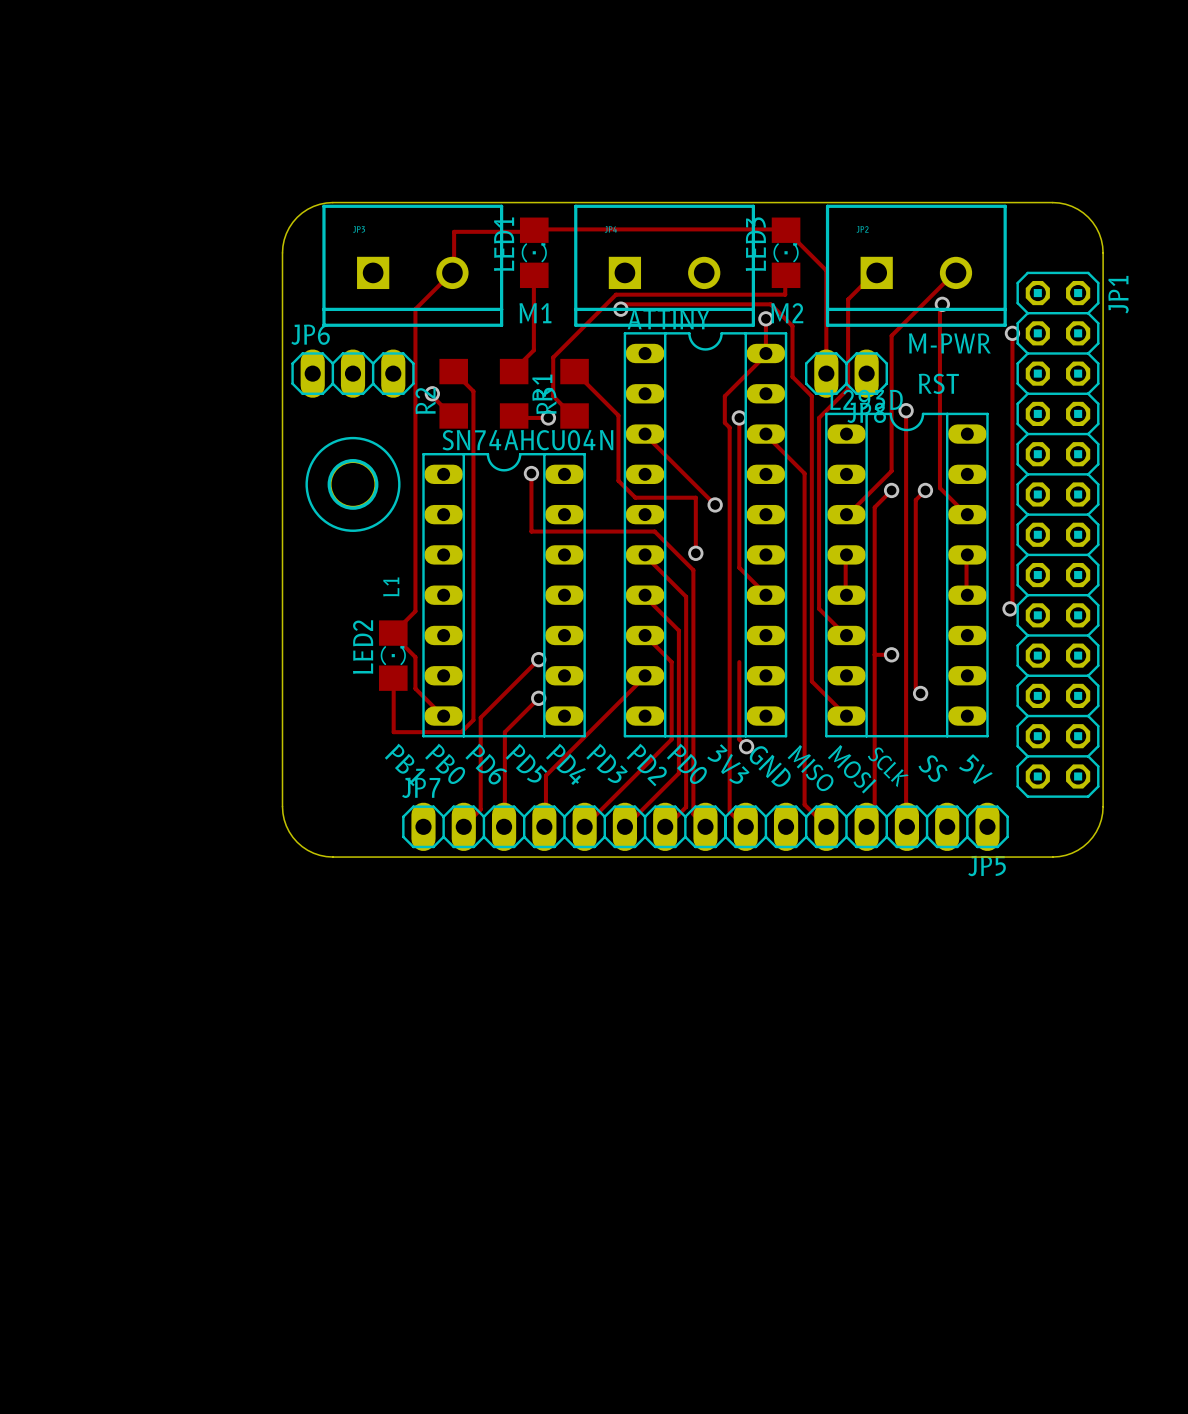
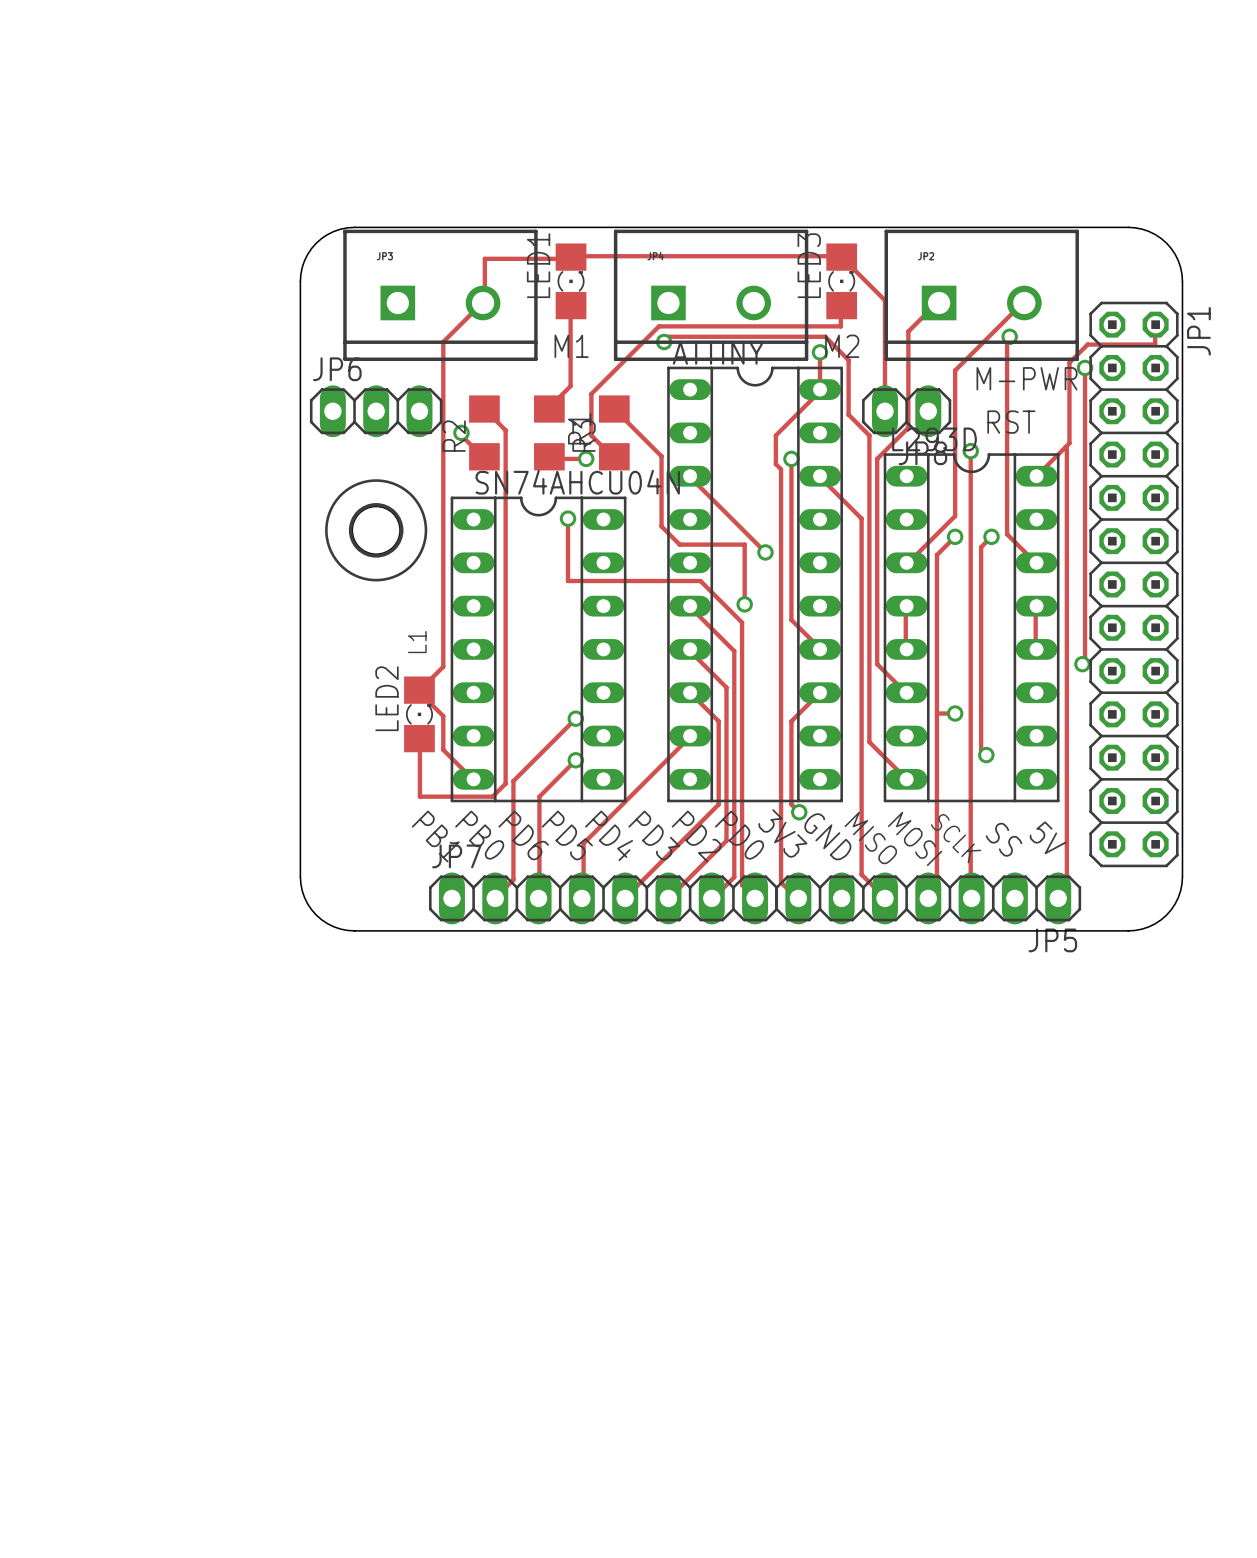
track: none -> (1155, 324) (1155, 344) (1087, 344) (1069, 362) (1069, 443) (1036, 476)
track: none -> (1065, 447) (1066, 890) (1058, 898)
track: none -> (820, 692) (791, 721)

